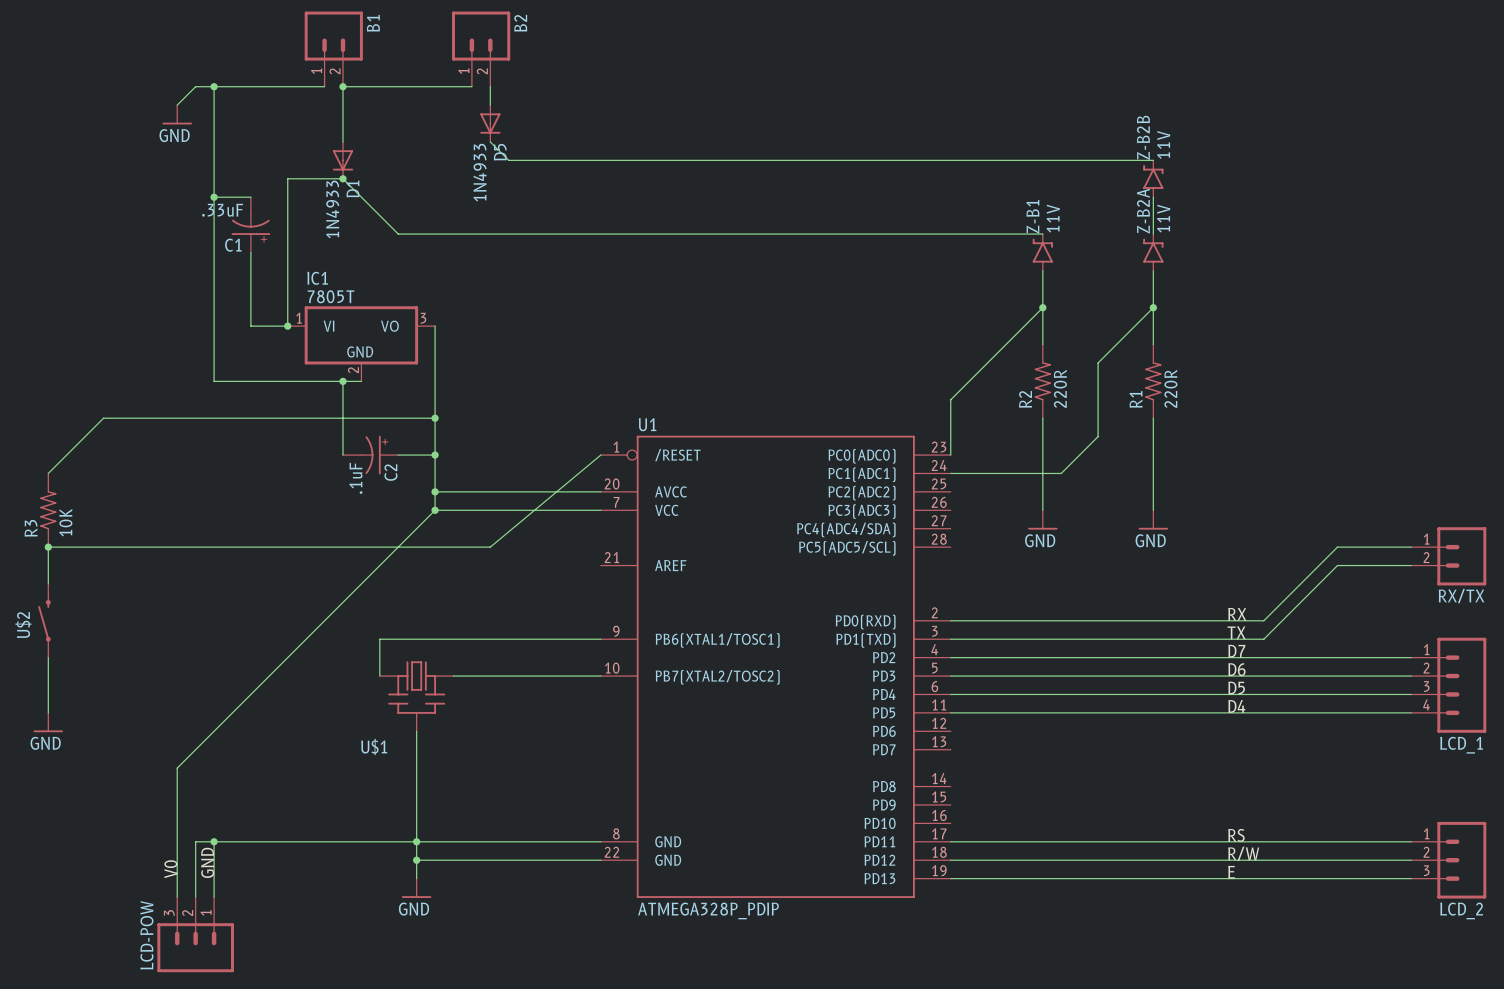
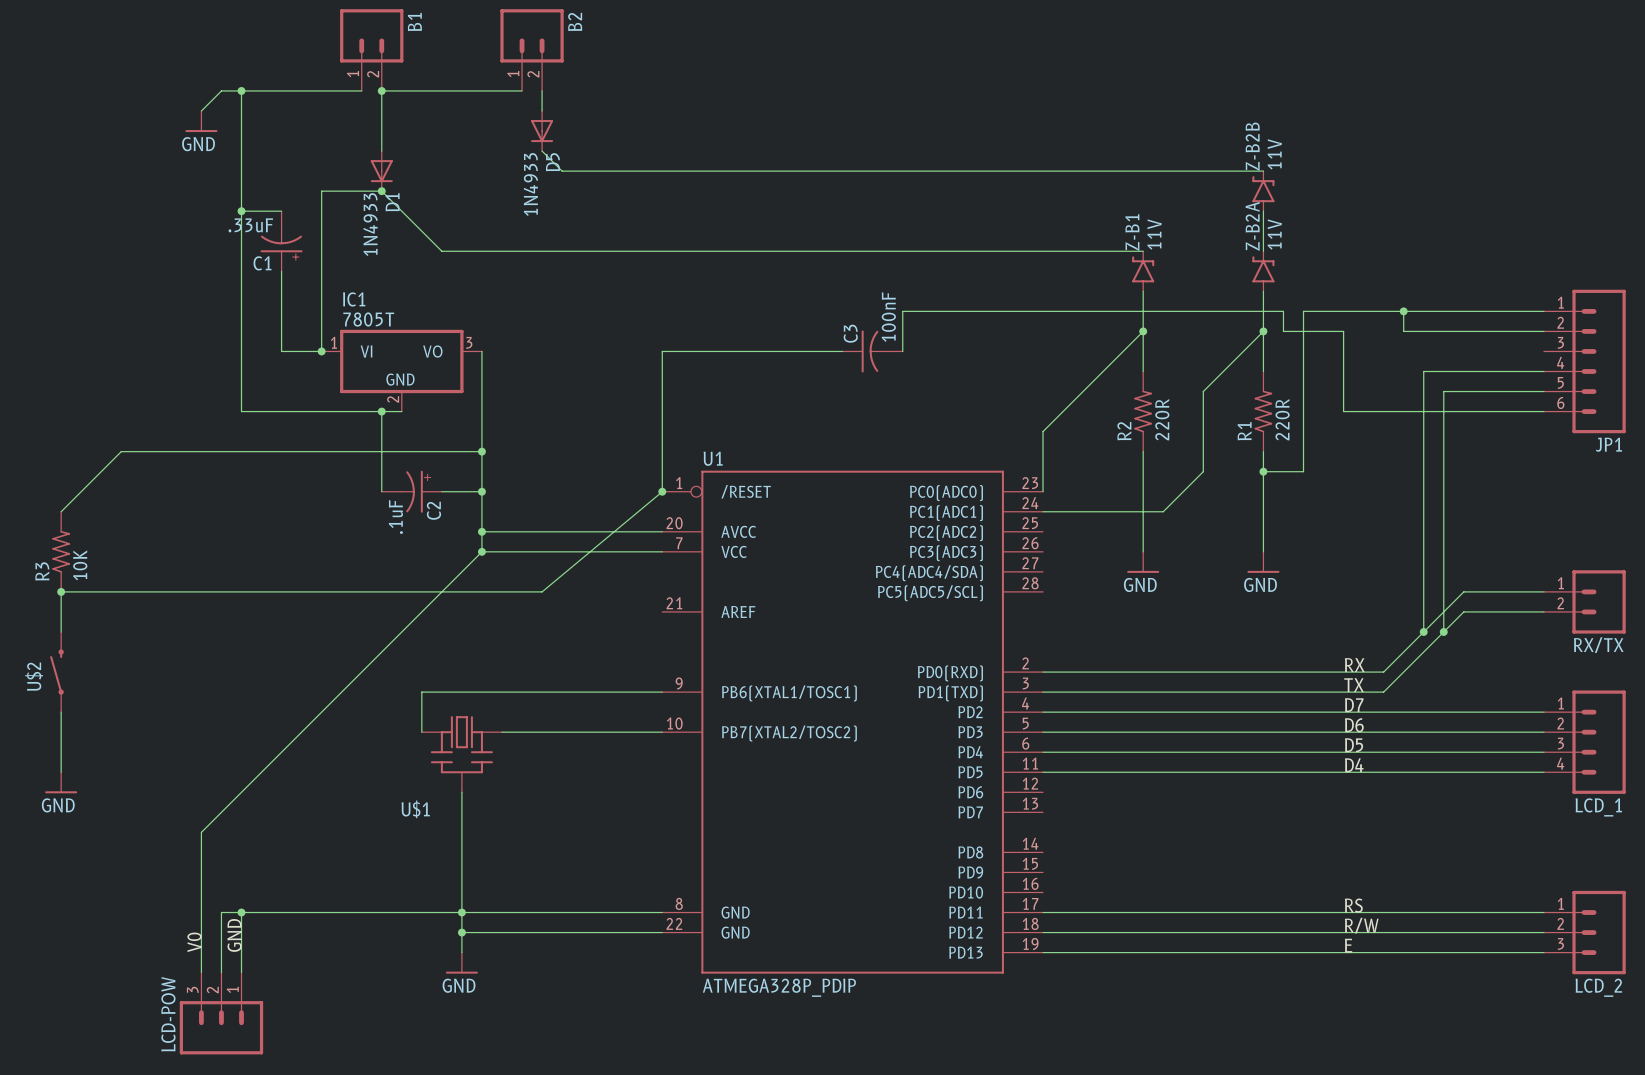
wire: none -> (1403, 311) (1403, 331) (1543, 331)
junction: none -> (1403, 311)
wire: none -> (1543, 311) (1303, 311) (1303, 471) (1263, 471)
wire: none -> (842, 351) (662, 351) (662, 491)
C3: none -> 100nF (872, 351)
wire: none -> (902, 351) (902, 311) (1283, 311) (1283, 331) (1343, 331) (1343, 411) (1543, 411)
JP1: none -> (1584, 361)
wire: none -> (1543, 371) (1423, 371) (1423, 631)
wire: none -> (1543, 391) (1443, 391) (1443, 631)
junction: none -> (1263, 471)
junction: none -> (662, 491)
junction: none -> (1423, 631)
junction: none -> (1443, 631)

